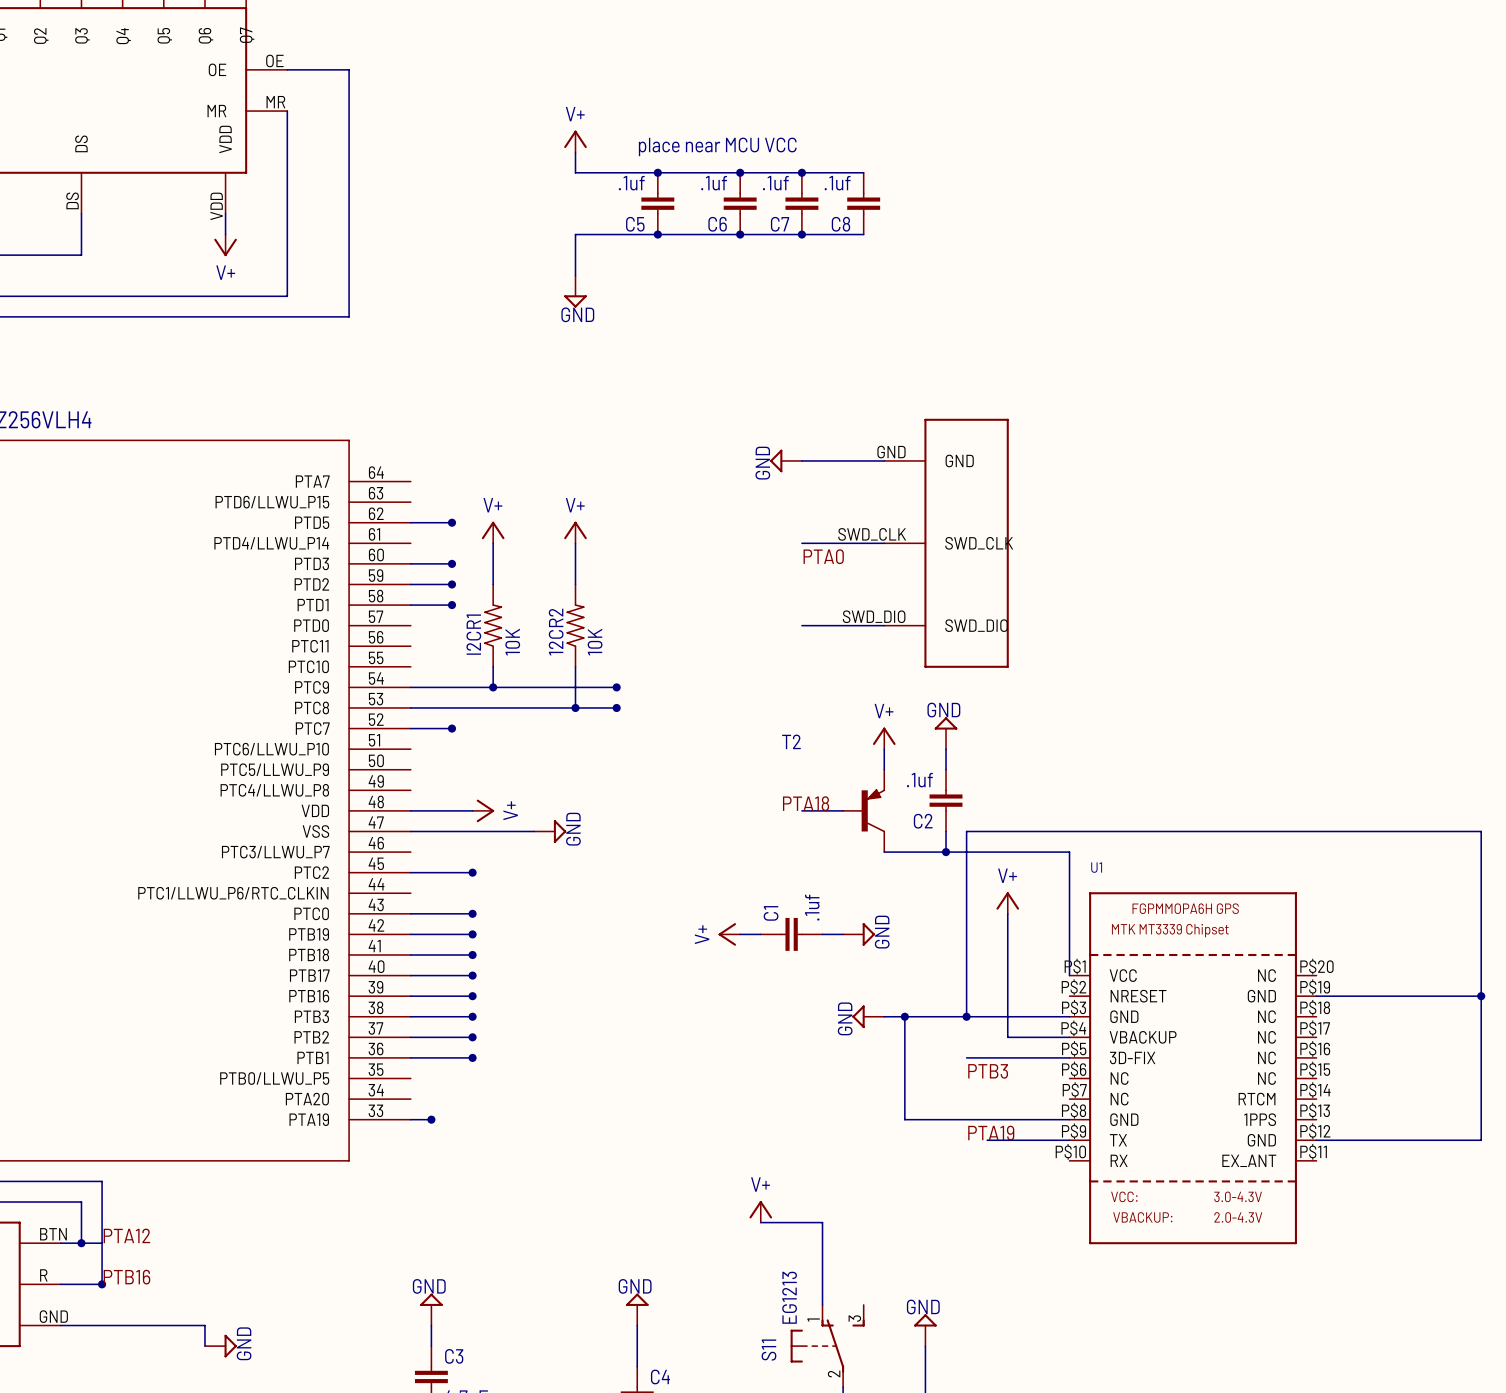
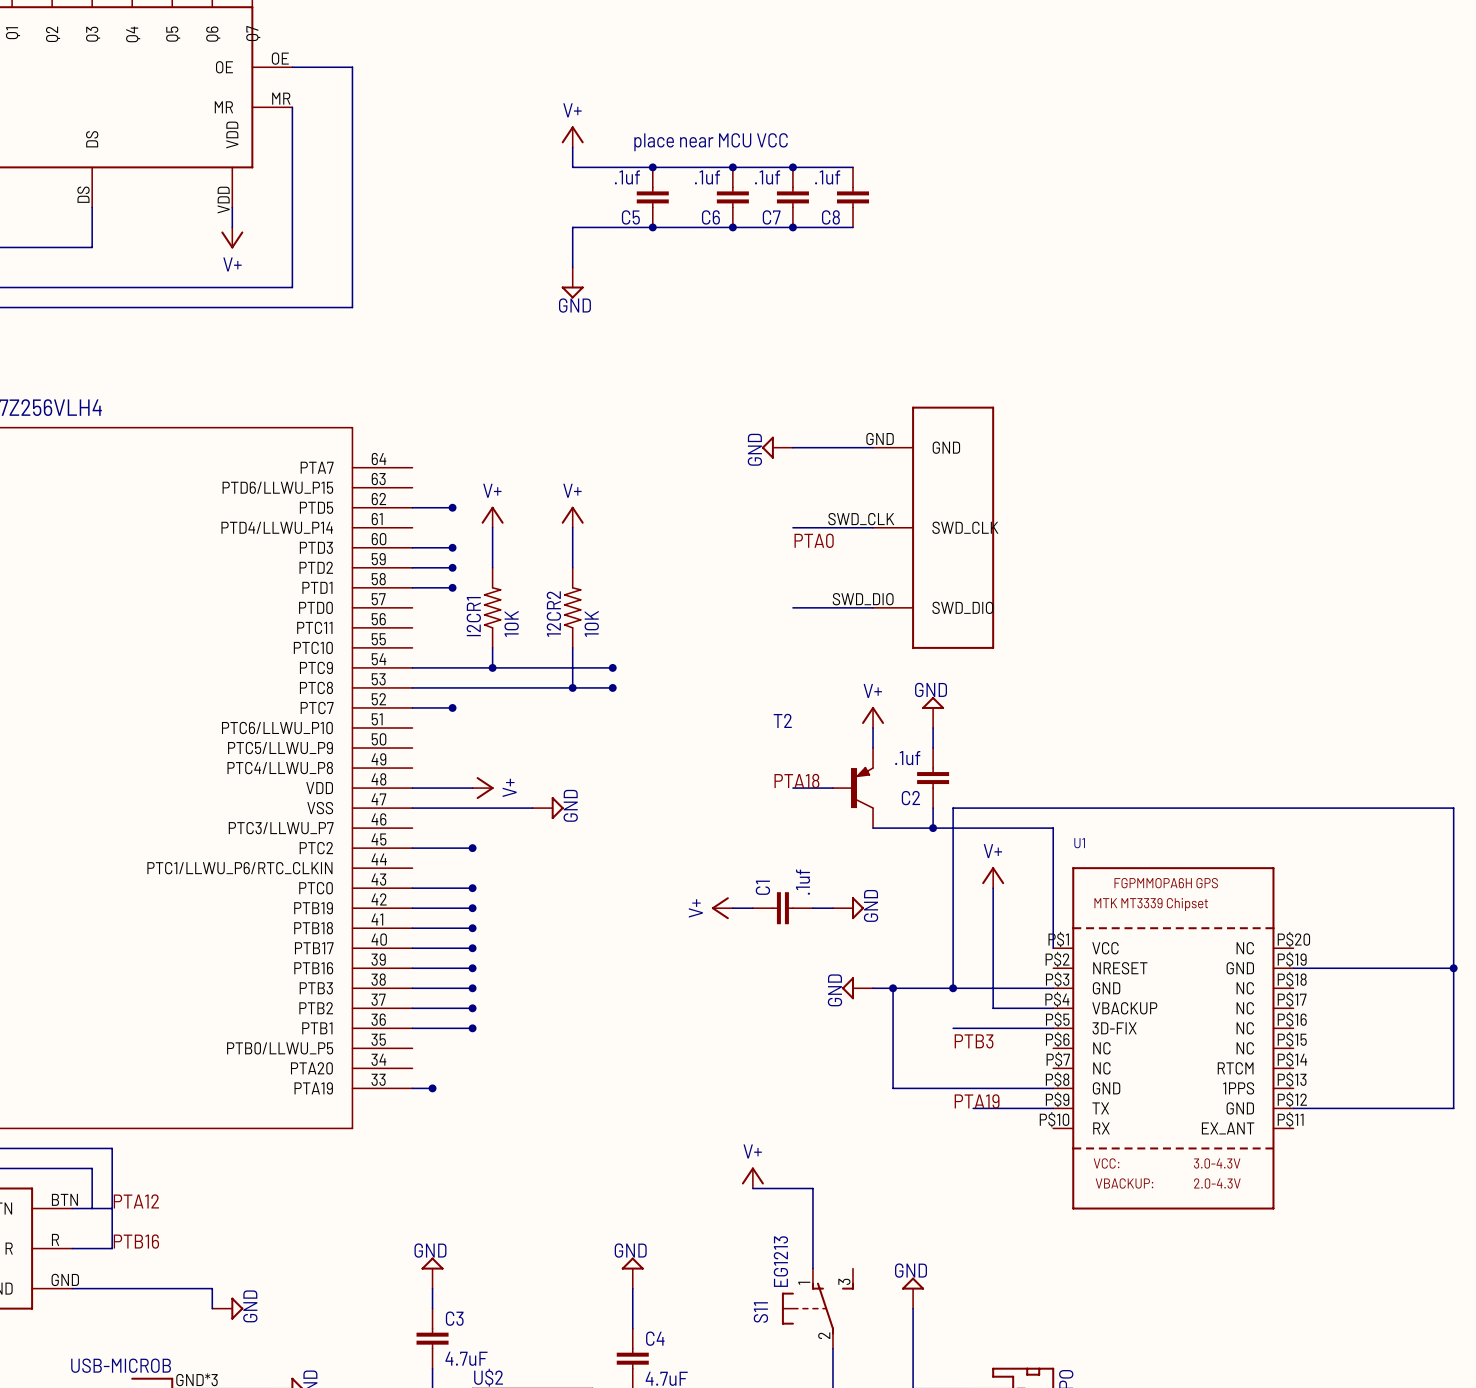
junction: (81, 1243) -> none
junction: (102, 1284) -> none

